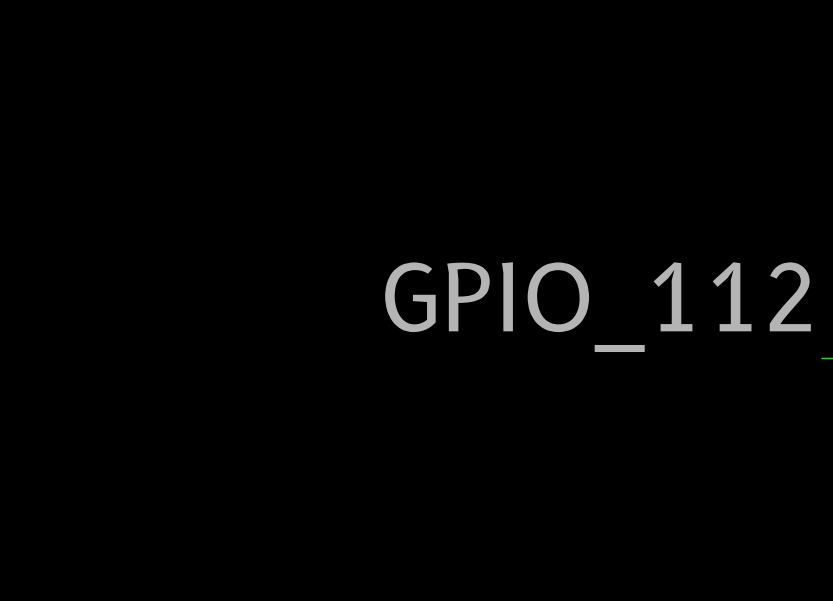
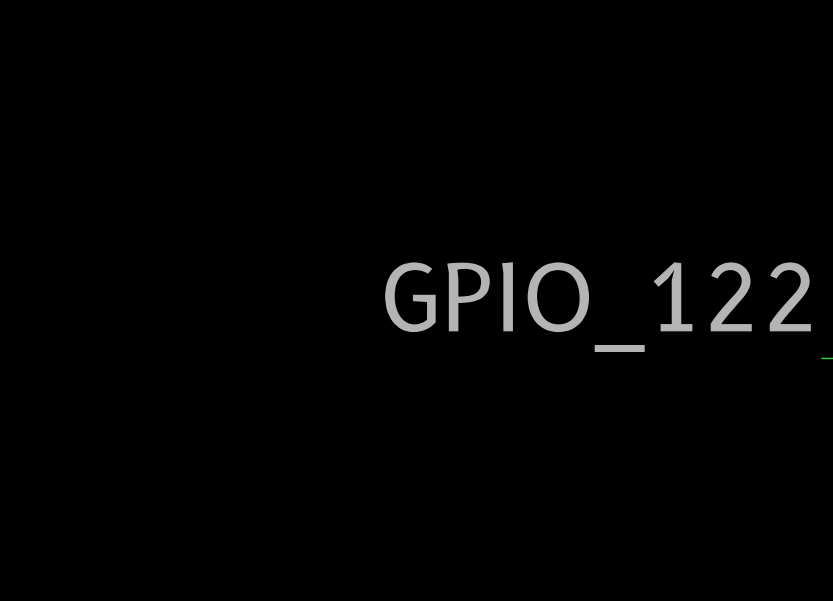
label: GPIO_112 (597, 307) -> GPIO_122 (597, 307)

